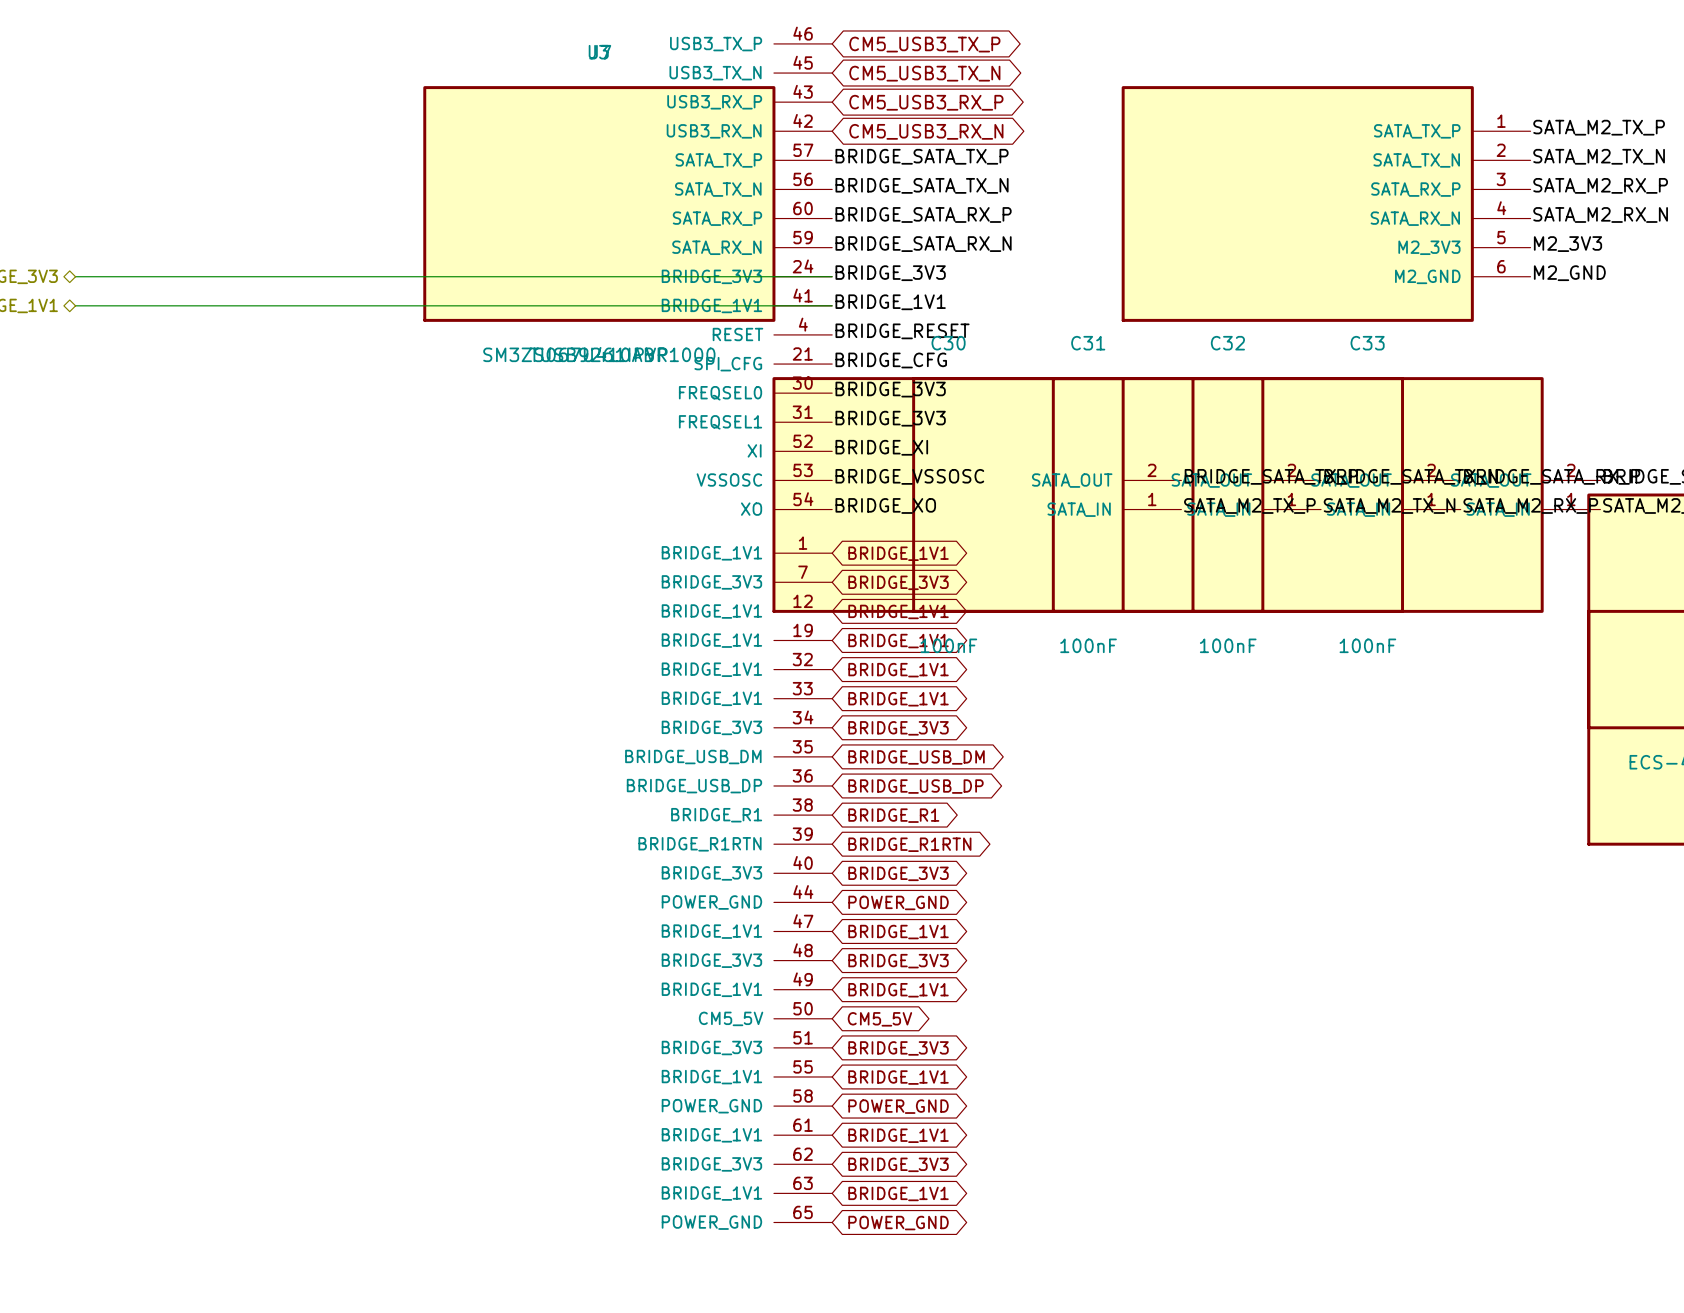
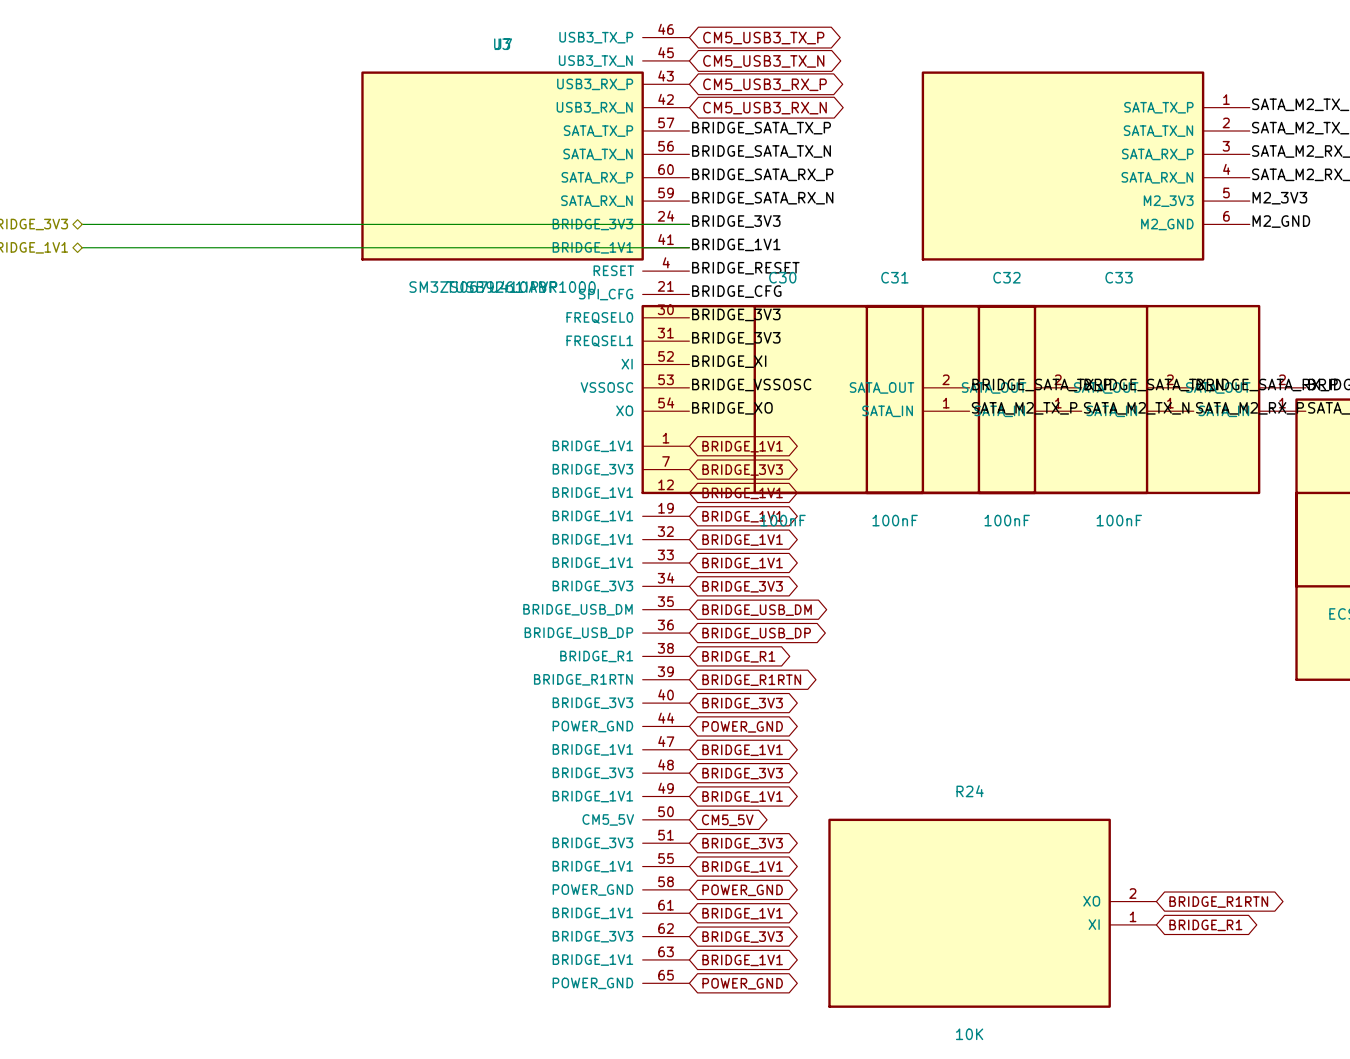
global label: none -> BRIDGE_R1RTN (1218, 902)
R24: none -> 10K (992, 913)
global label: none -> BRIDGE_R1 (1205, 925)

